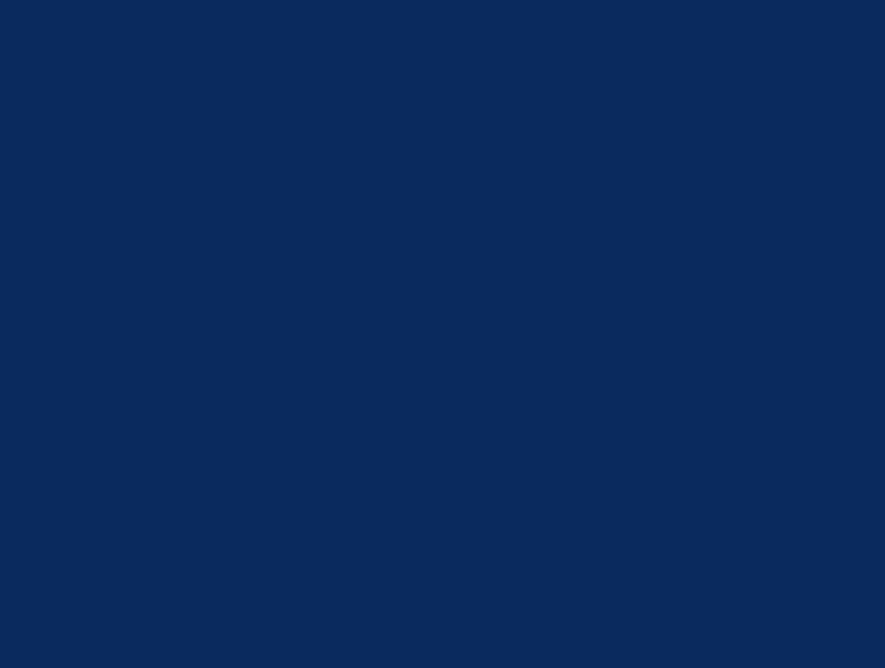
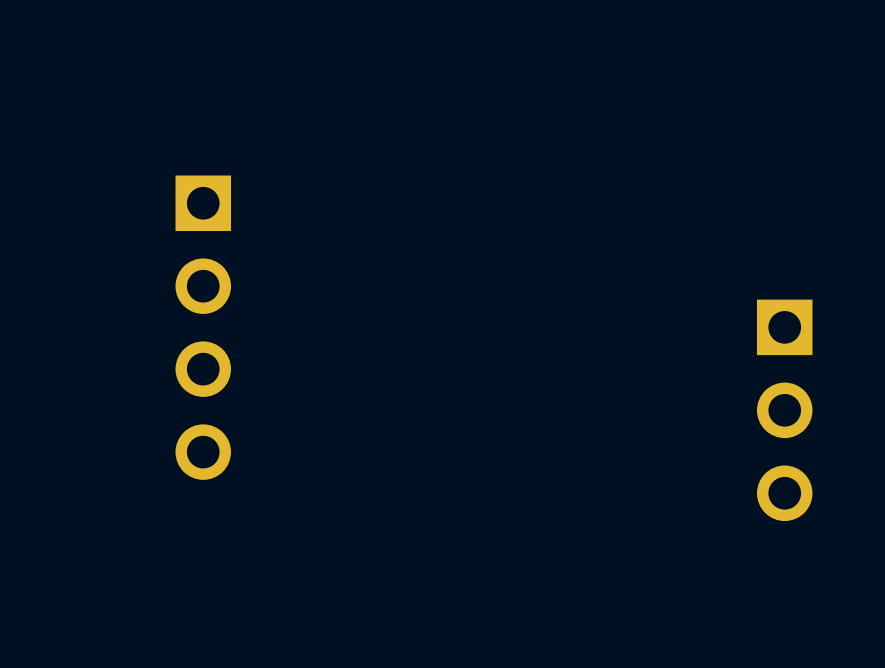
part: none -> (203, 327)
part: none -> (784, 410)

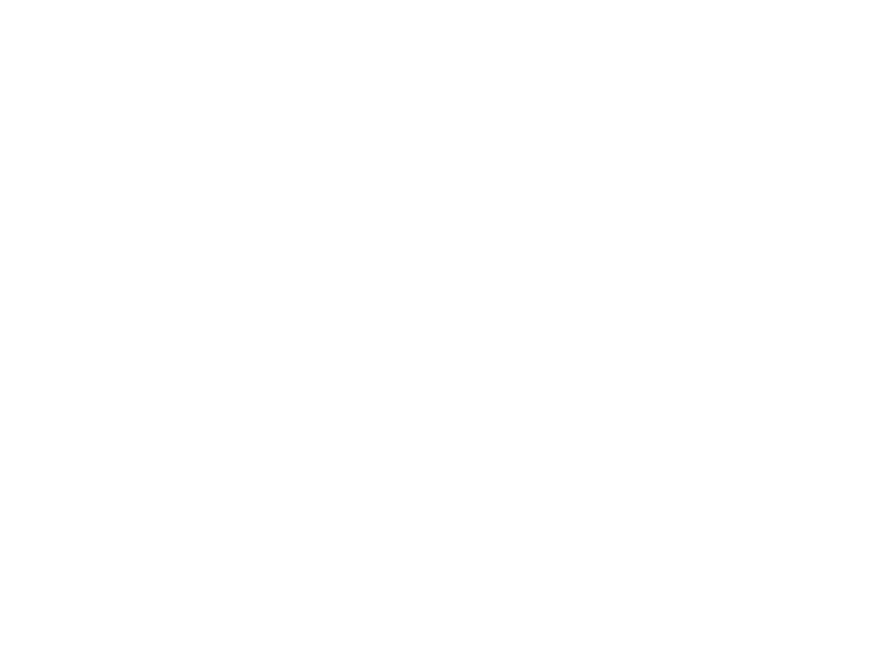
part: (203, 327) -> none
part: (784, 410) -> none

